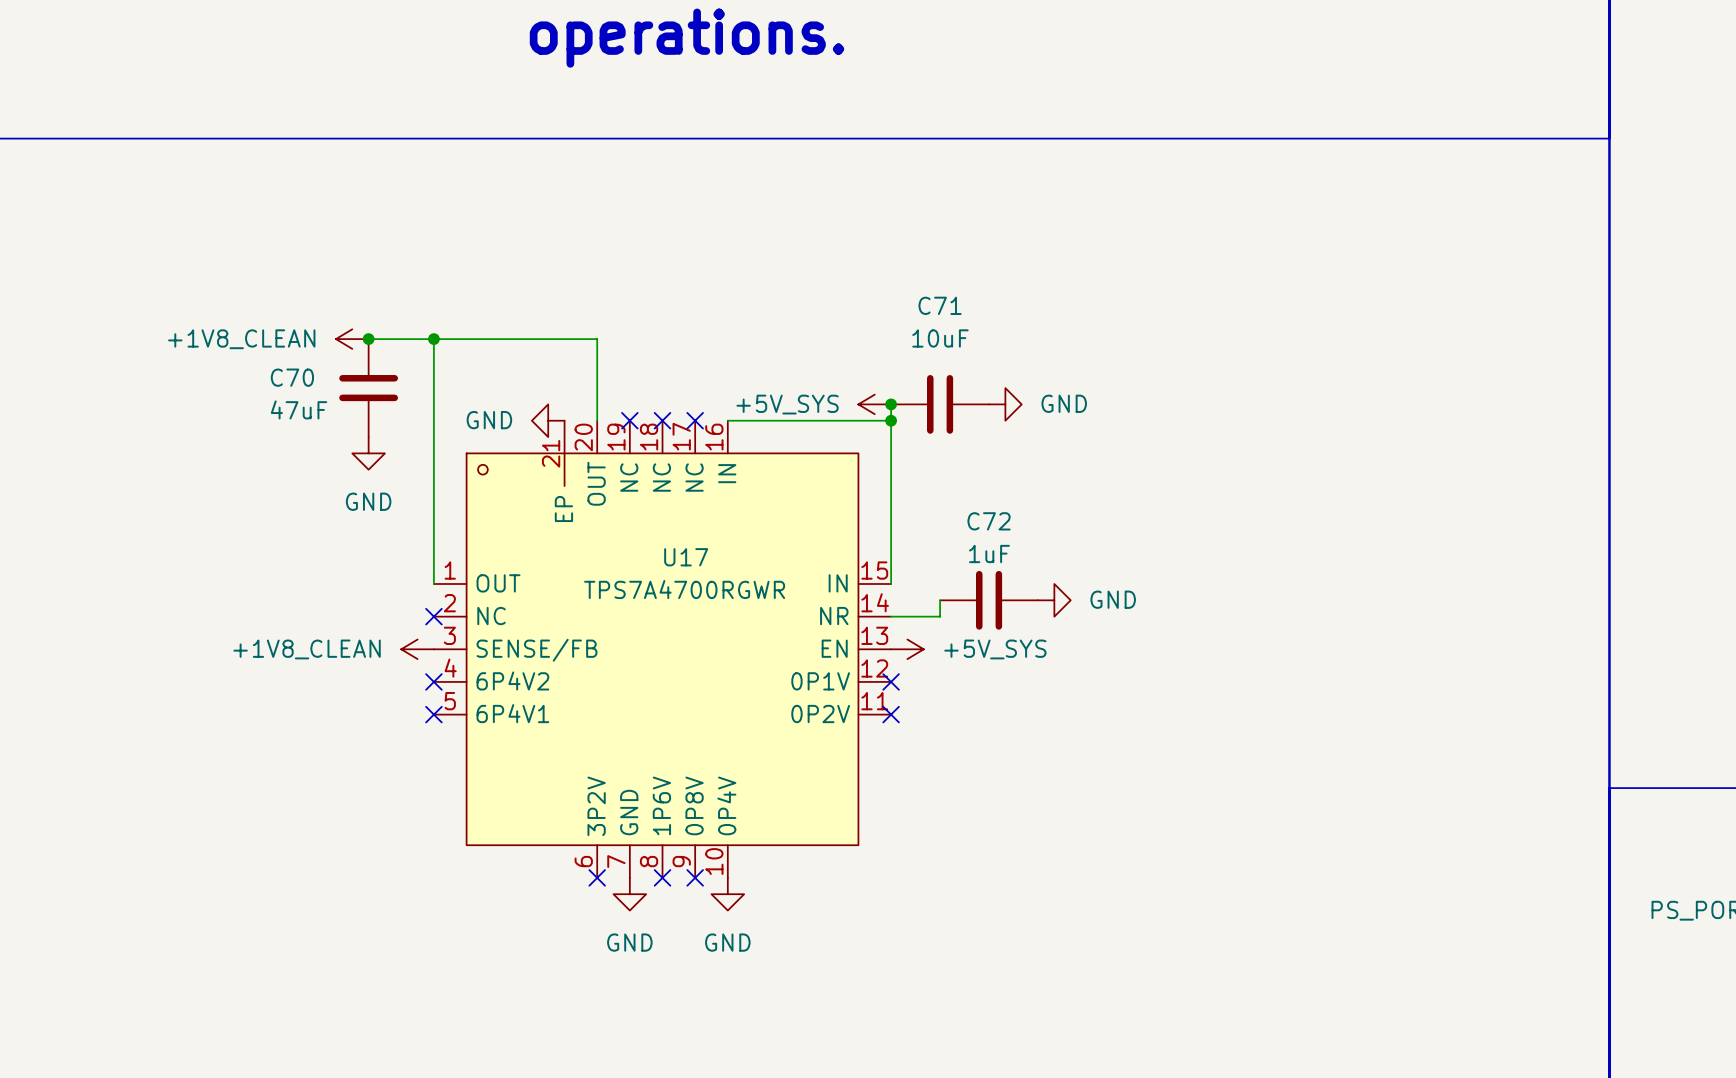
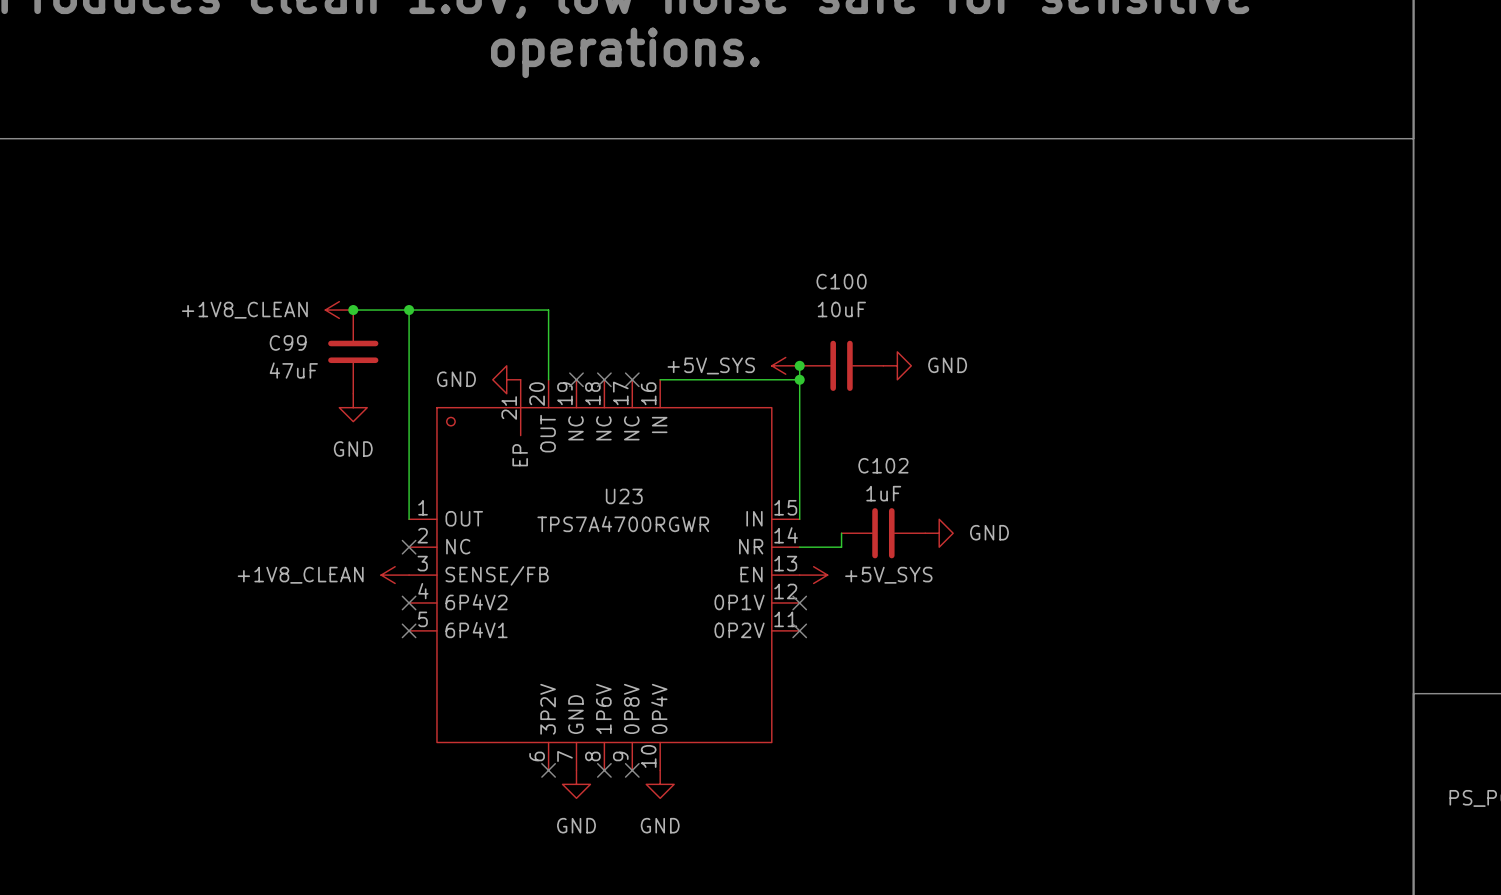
C71 name: C71 (940, 305) -> C100 (841, 281)
C70 name: C70 (292, 377) -> C99 (288, 342)
C72 name: C72 (989, 521) -> C102 (883, 465)
U17 name: U17 (686, 557) -> U23 (624, 496)

